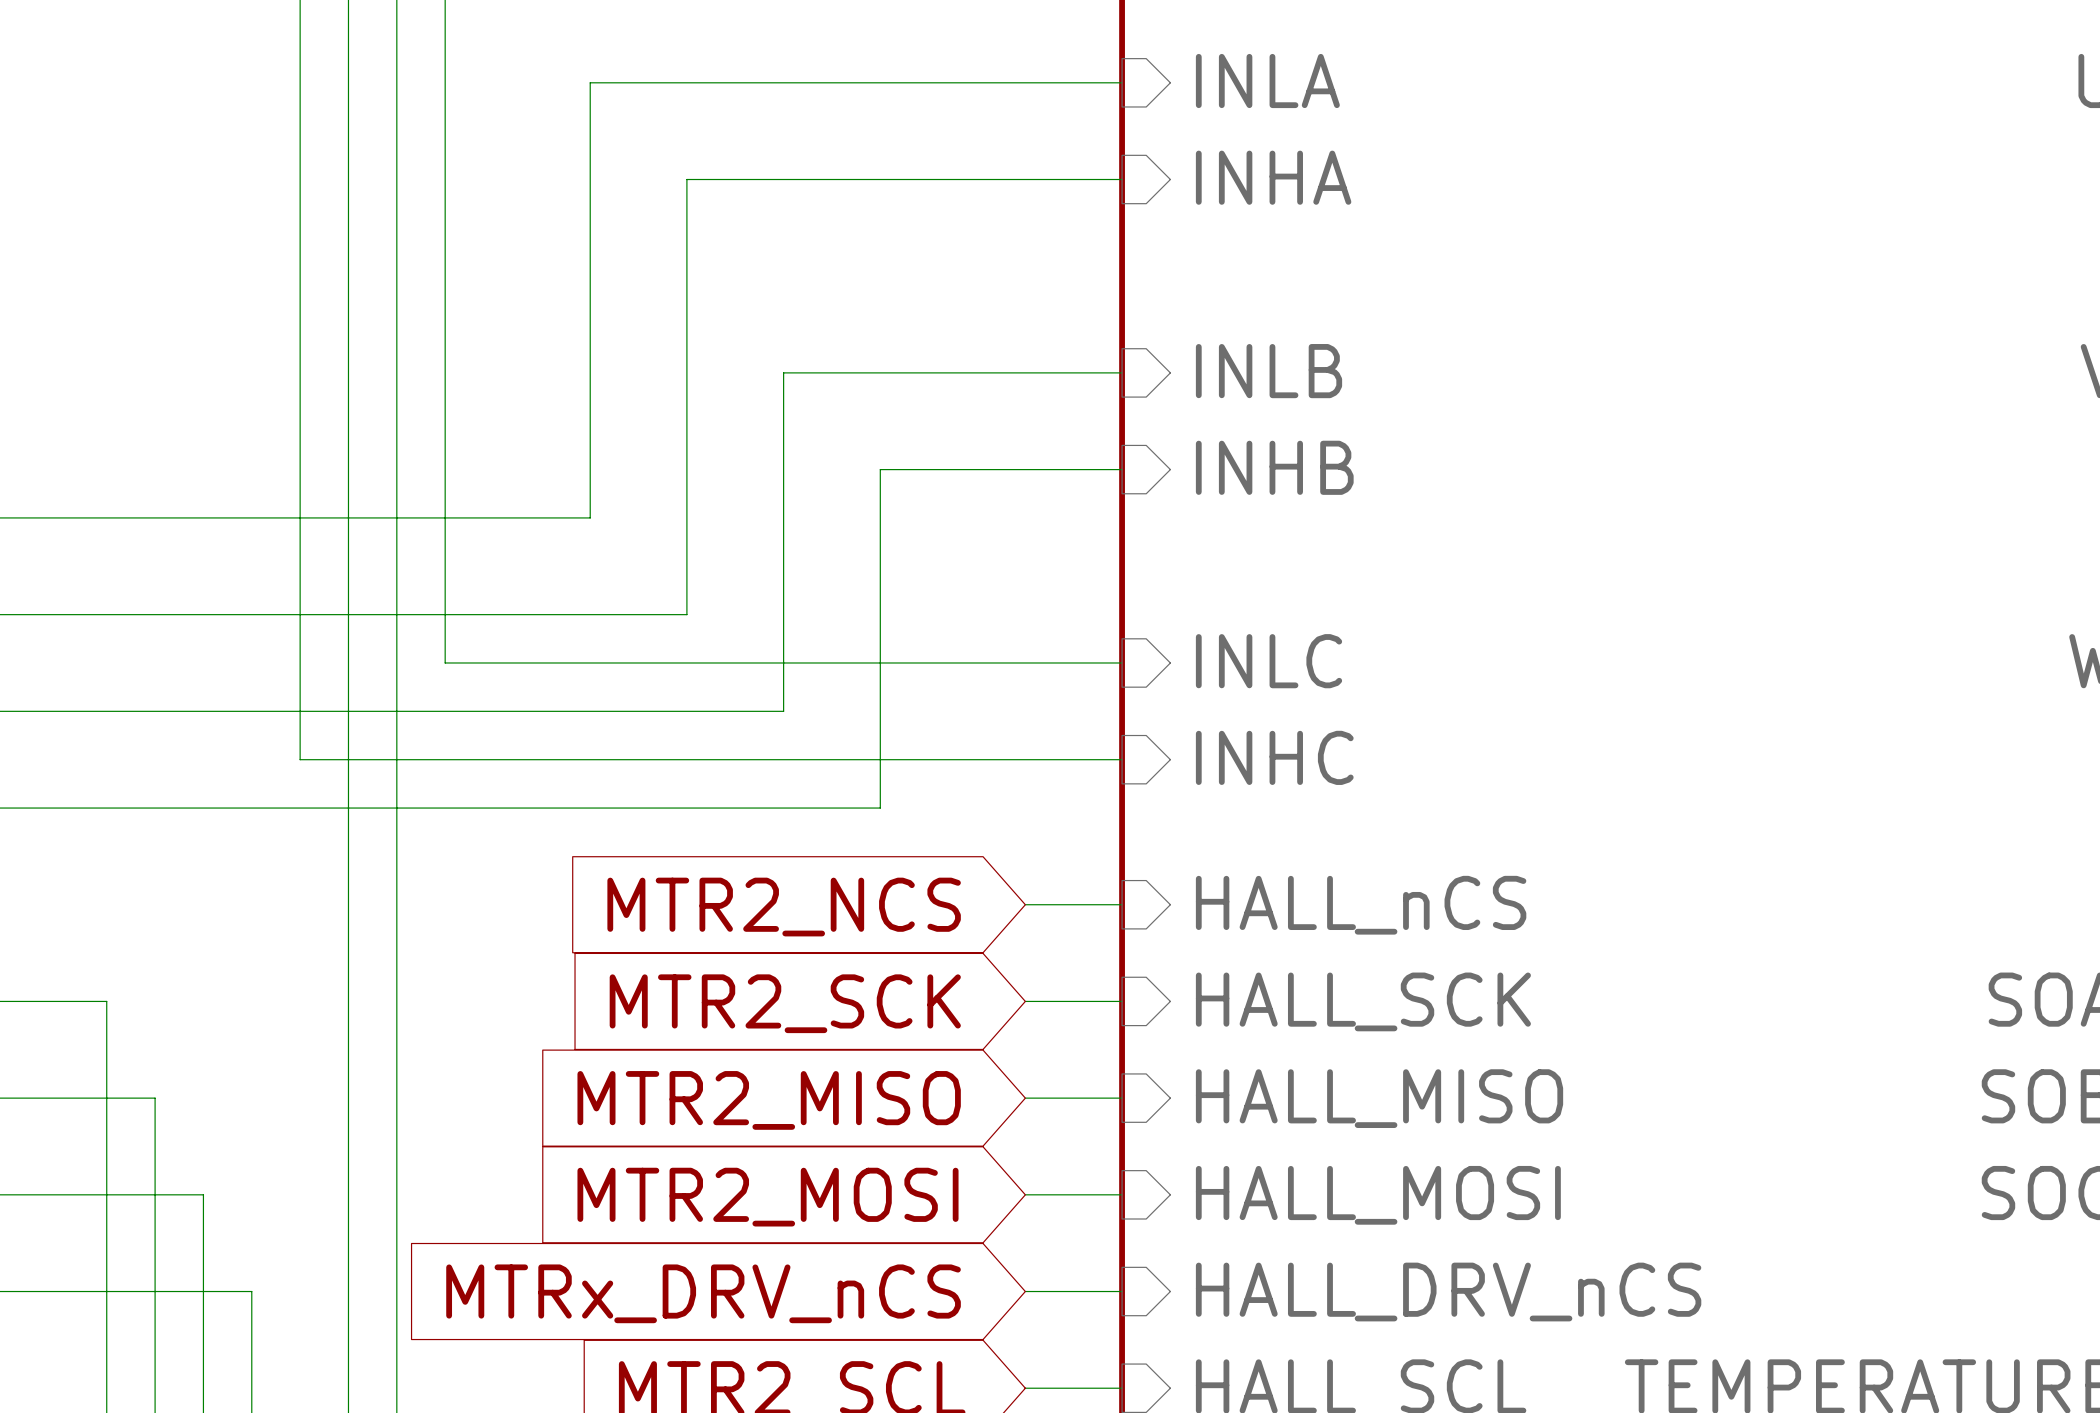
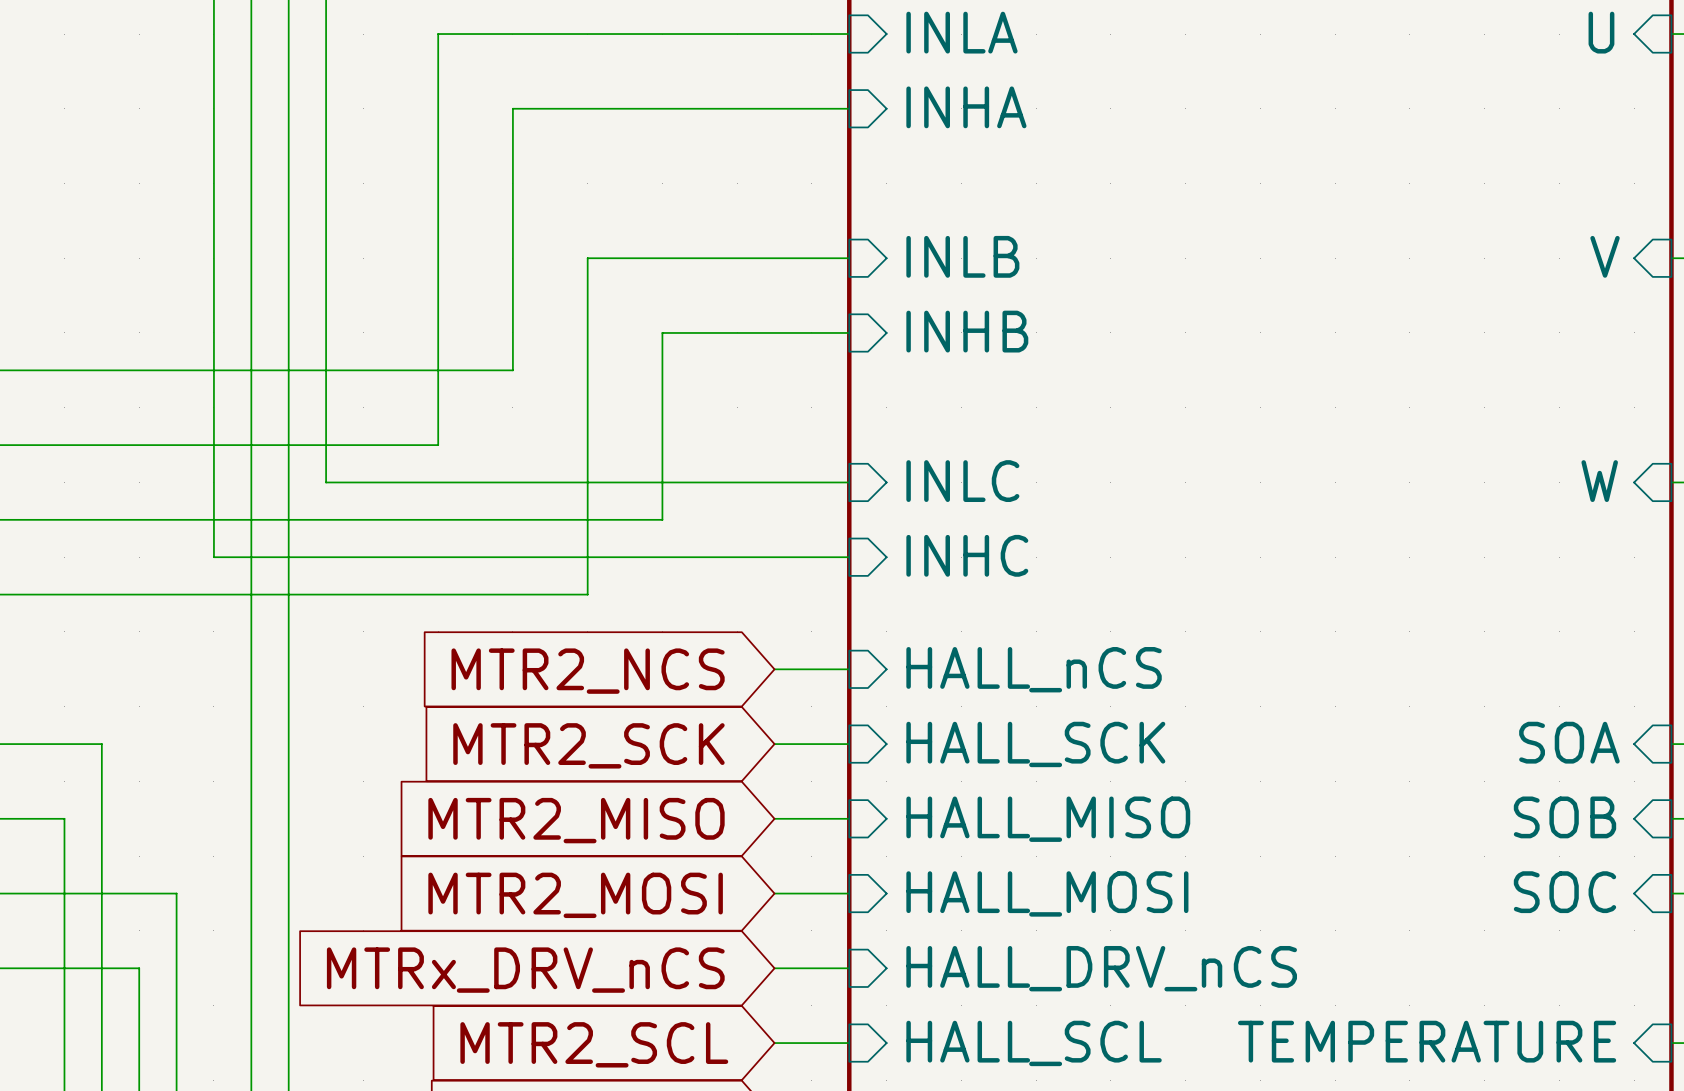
wire: (686, 517) (686, 614) (590, 614) -> (512, 370) (438, 370) (438, 445)
wire: (880, 711) (880, 808) (783, 808) -> (662, 519) (587, 519) (587, 594)
wire: (106, 1001) (106, 1098) (155, 1098) -> (64, 744) (101, 744) (101, 818)
wire: (203, 1194) (203, 1291) (251, 1291) -> (139, 893) (176, 893) (176, 968)

